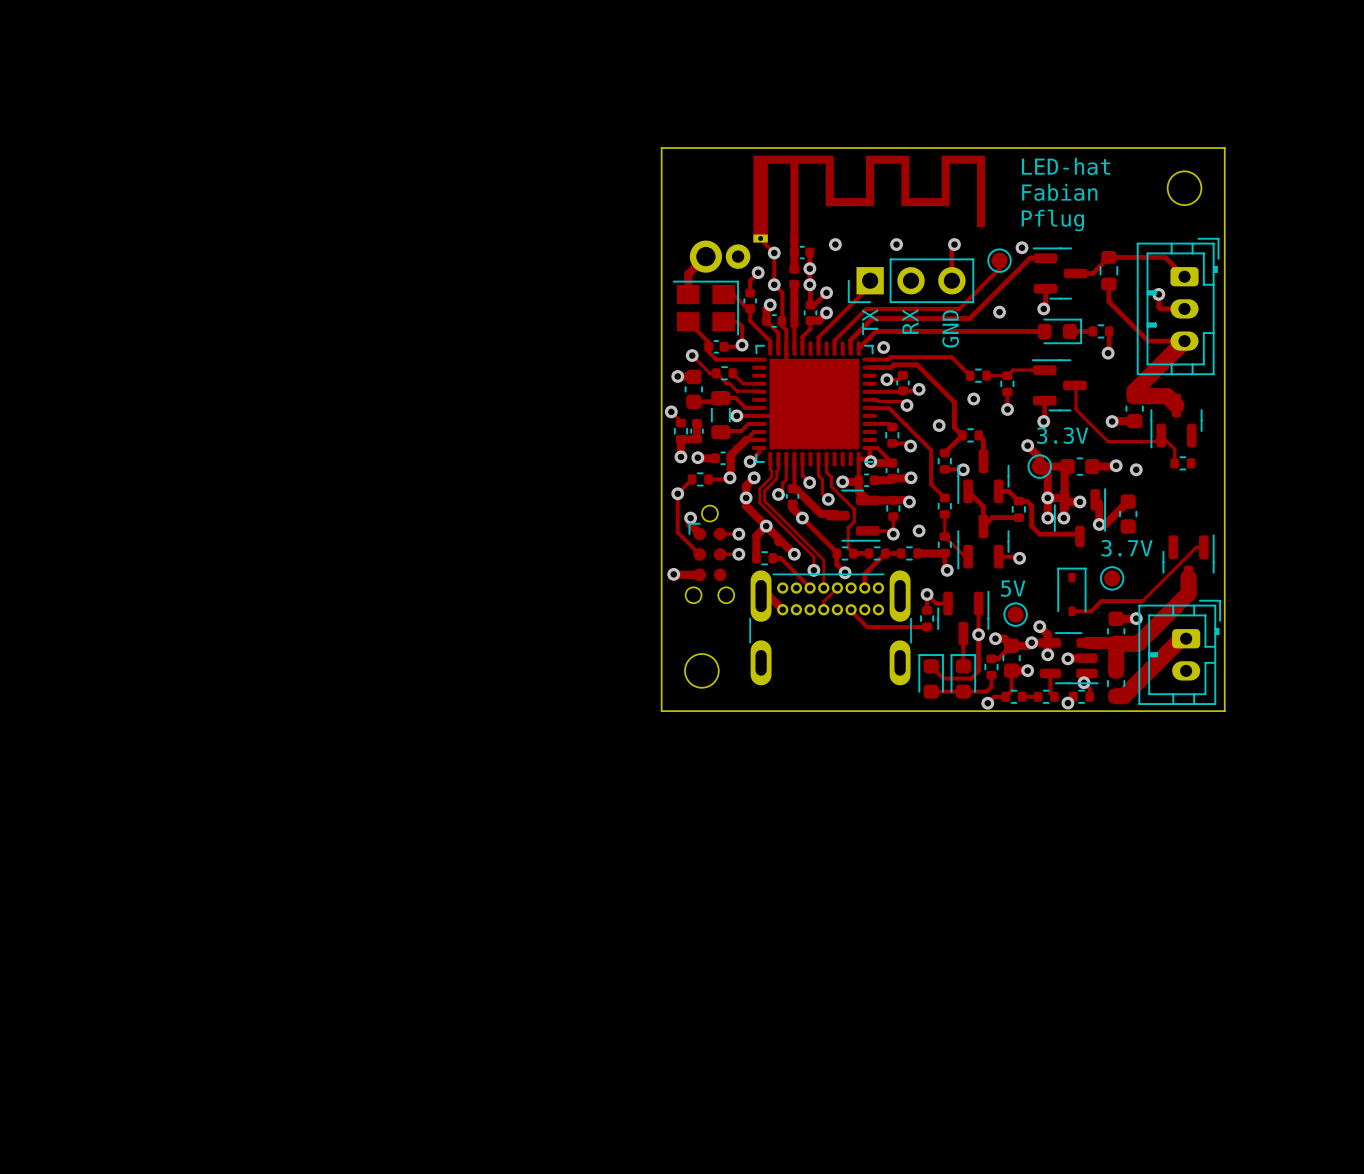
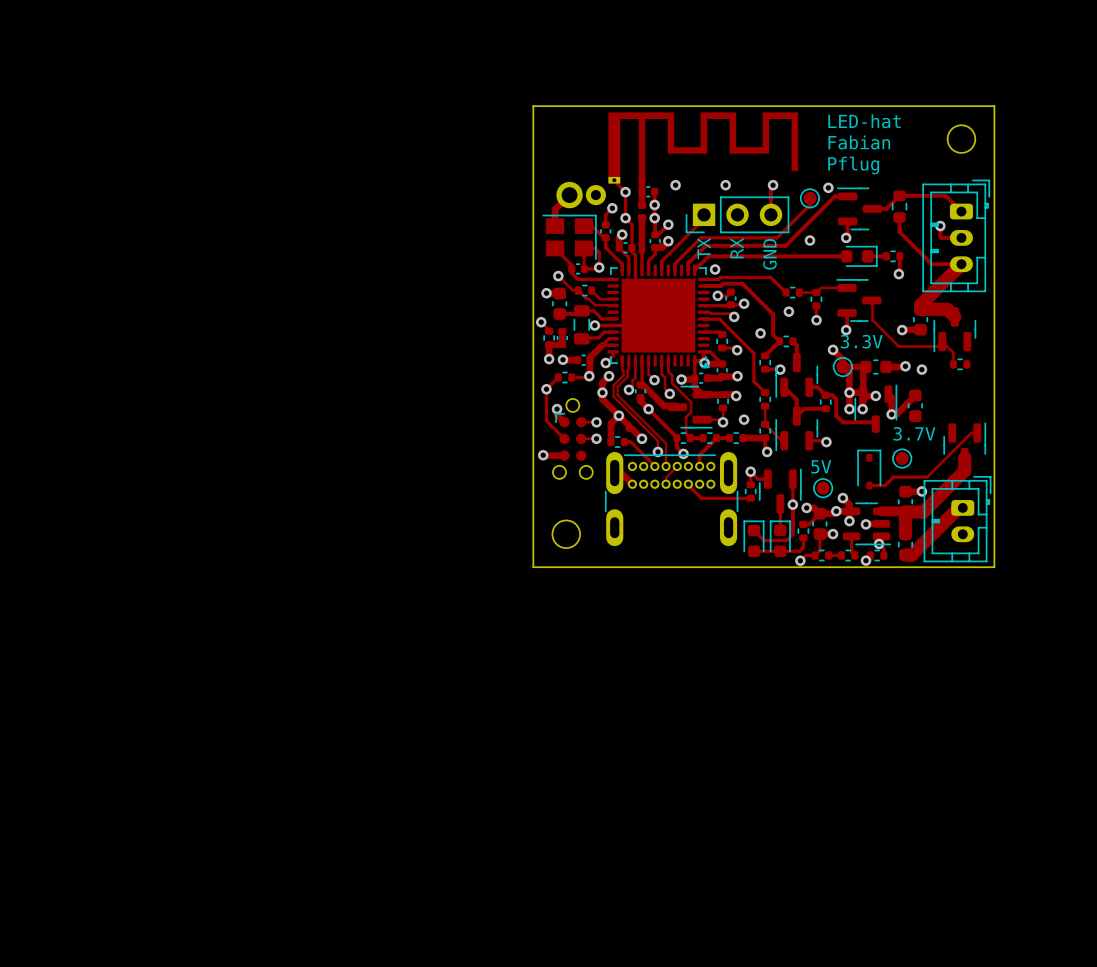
track: none -> (584, 248) (584, 268)
part footprint: [752, 341, 877, 467] -> [607, 264, 710, 369]

